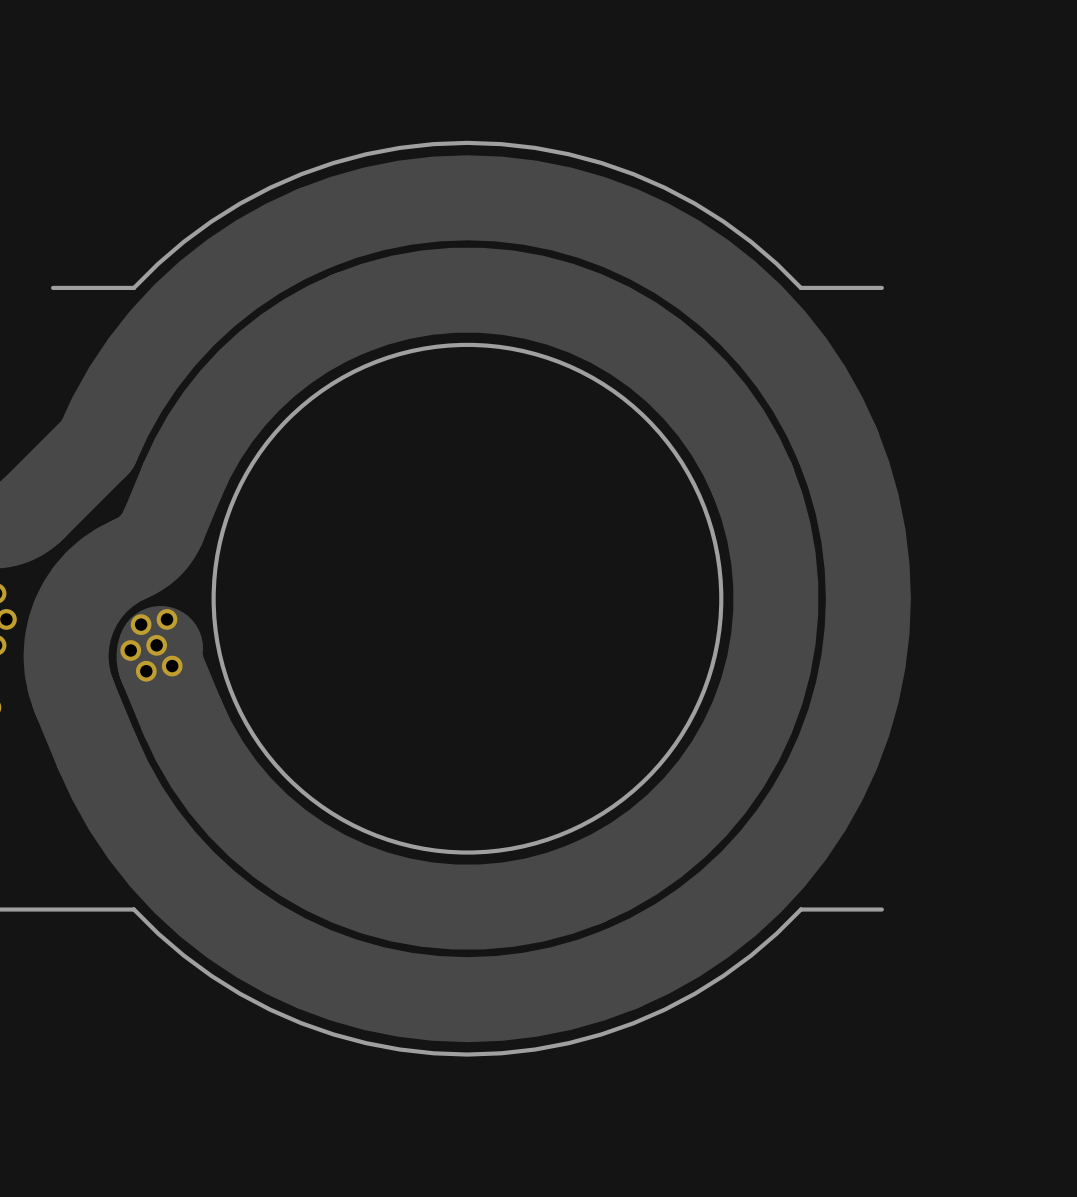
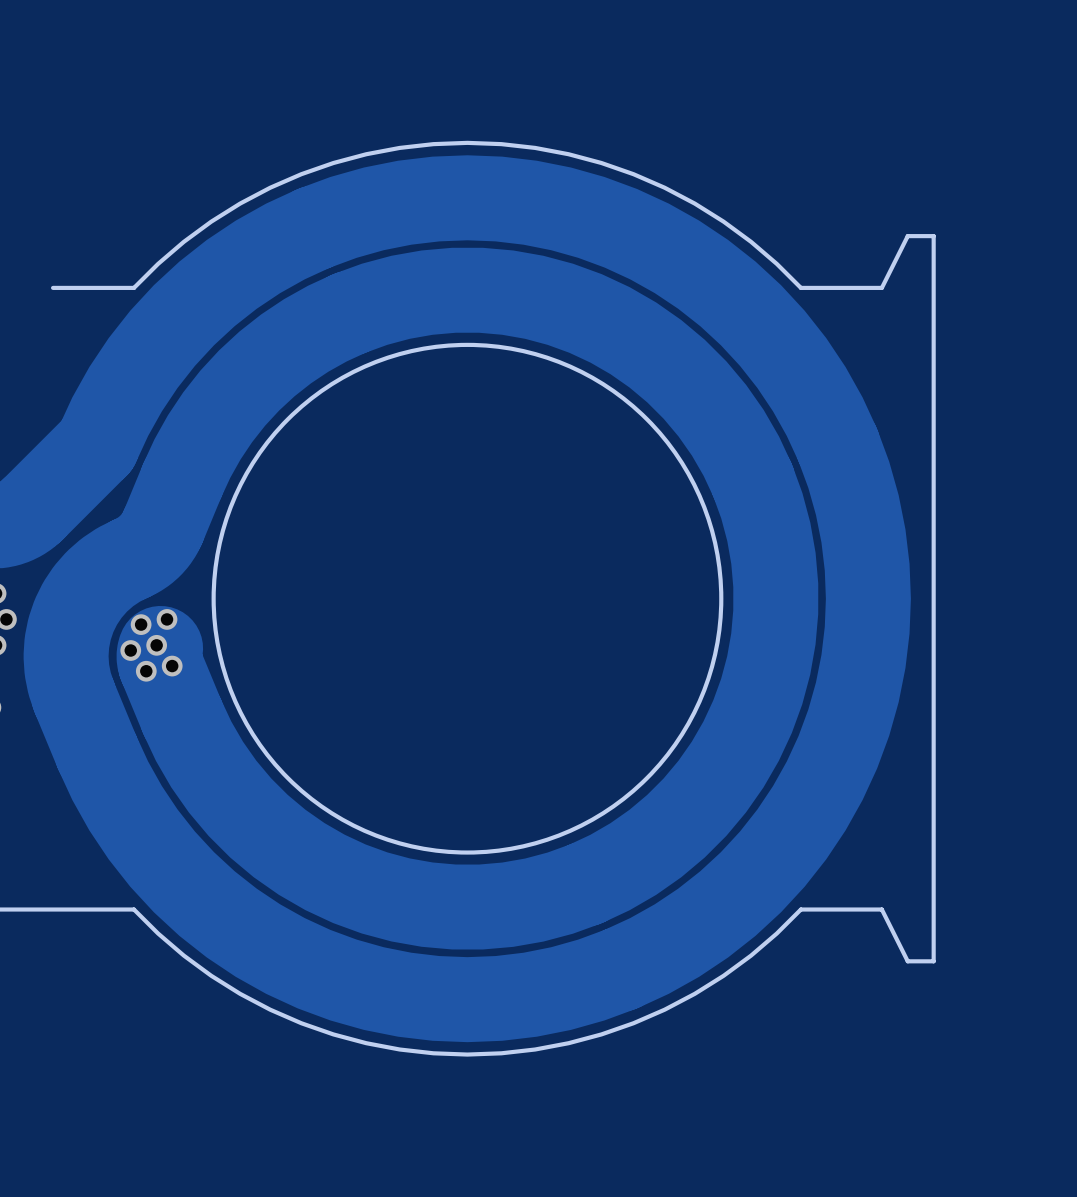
board edge: none -> (881, 287) (907, 236) (933, 236) (933, 961) (907, 961) (881, 909)

